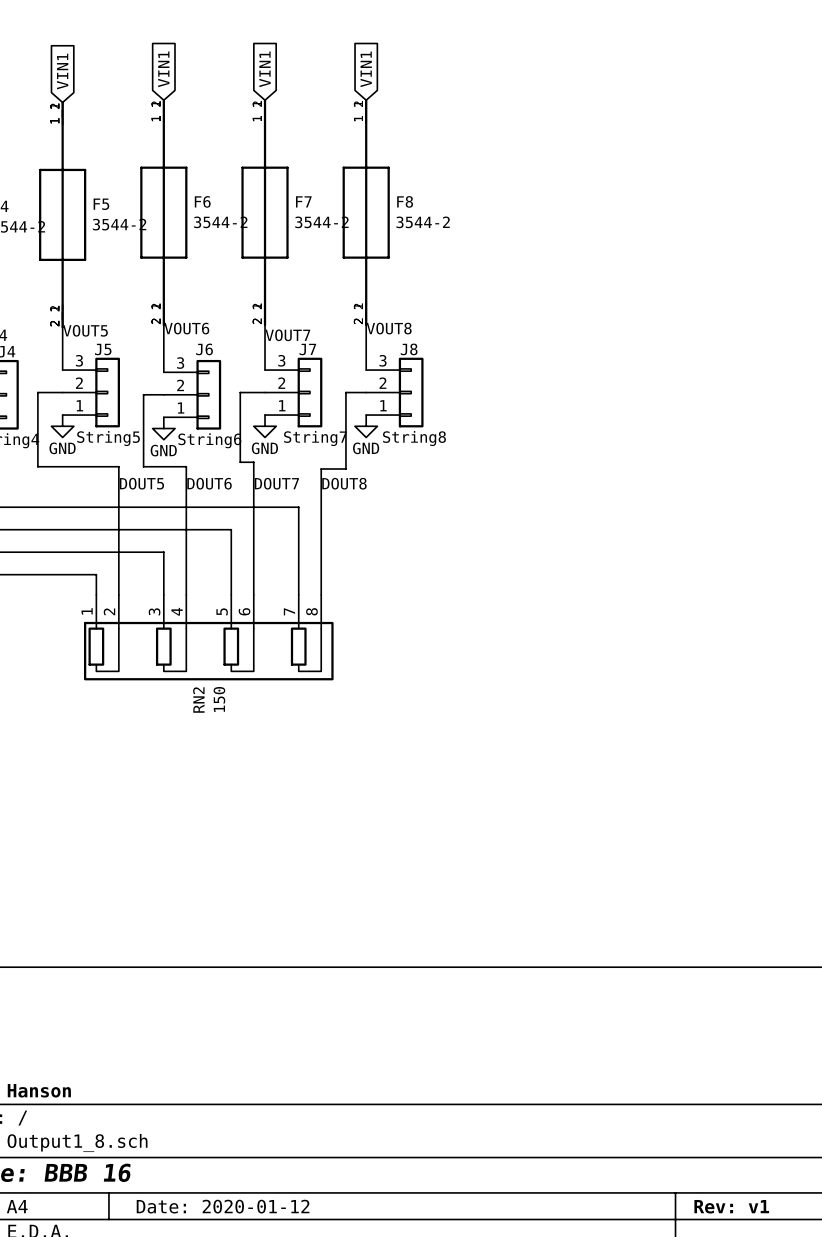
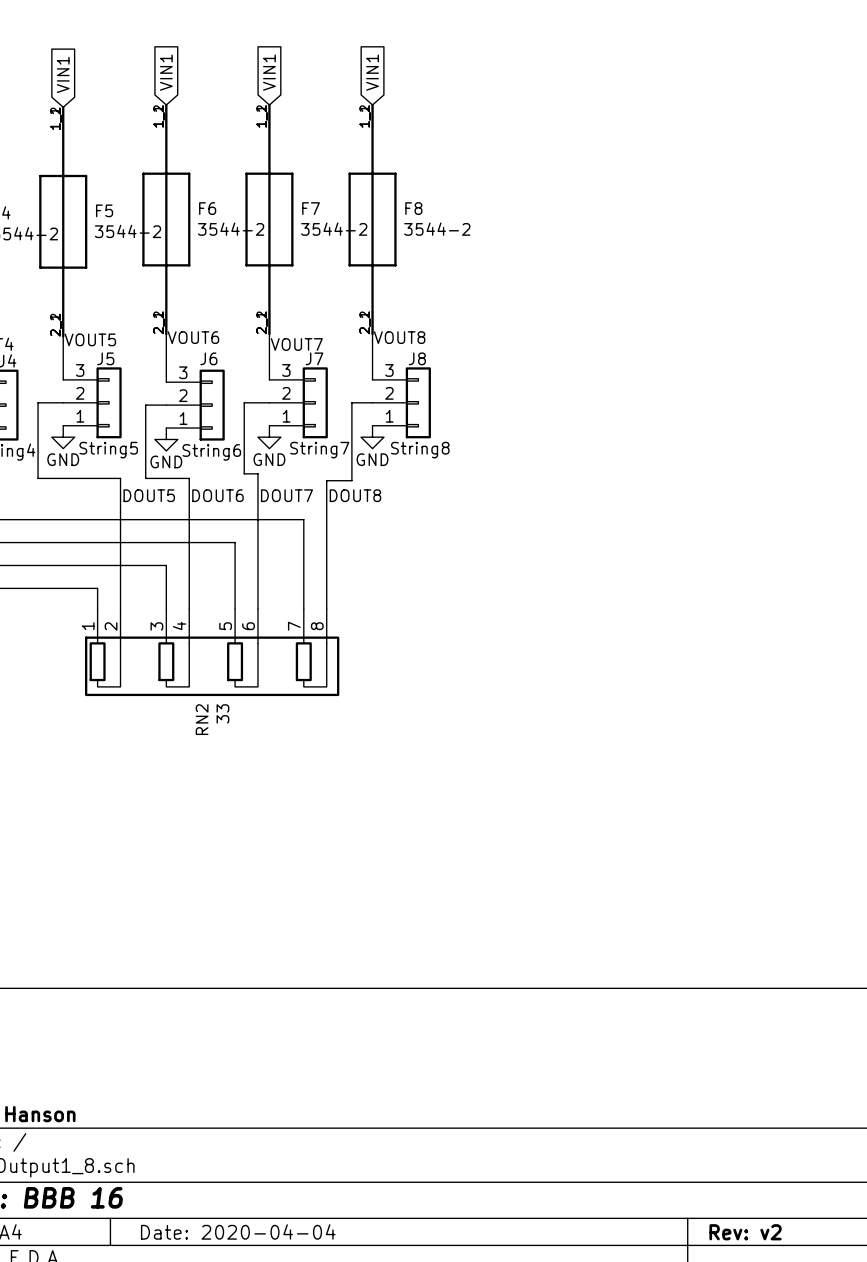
RN2 value: 150 (219, 699) -> 33 (222, 713)
title block: Date: 2020-01-12 (223, 1206) -> Date: 2020-04-04 (238, 1231)
title block: Rev: v1 (731, 1206) -> Rev: v2 (745, 1232)

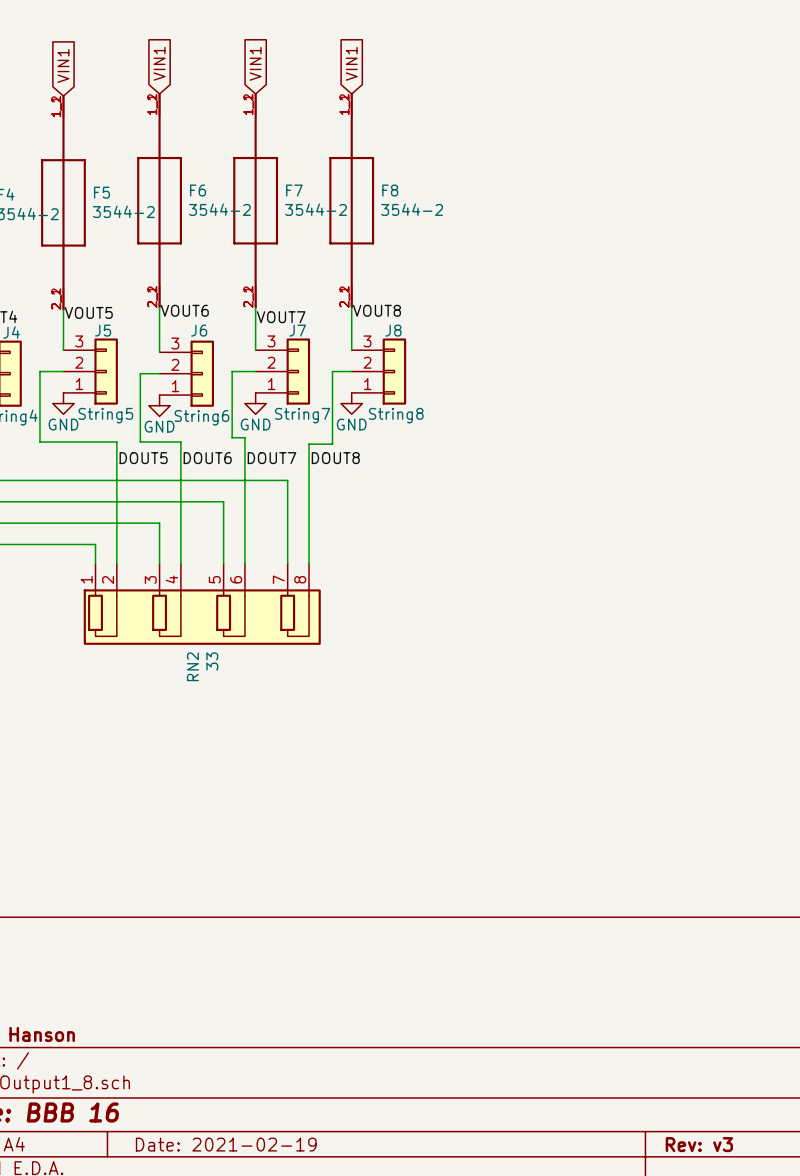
title block: Date: 2020-04-04 (238, 1231) -> Date: 2021-02-19 (226, 1144)
title block: Rev: v2 (745, 1232) -> Rev: v3 (699, 1144)

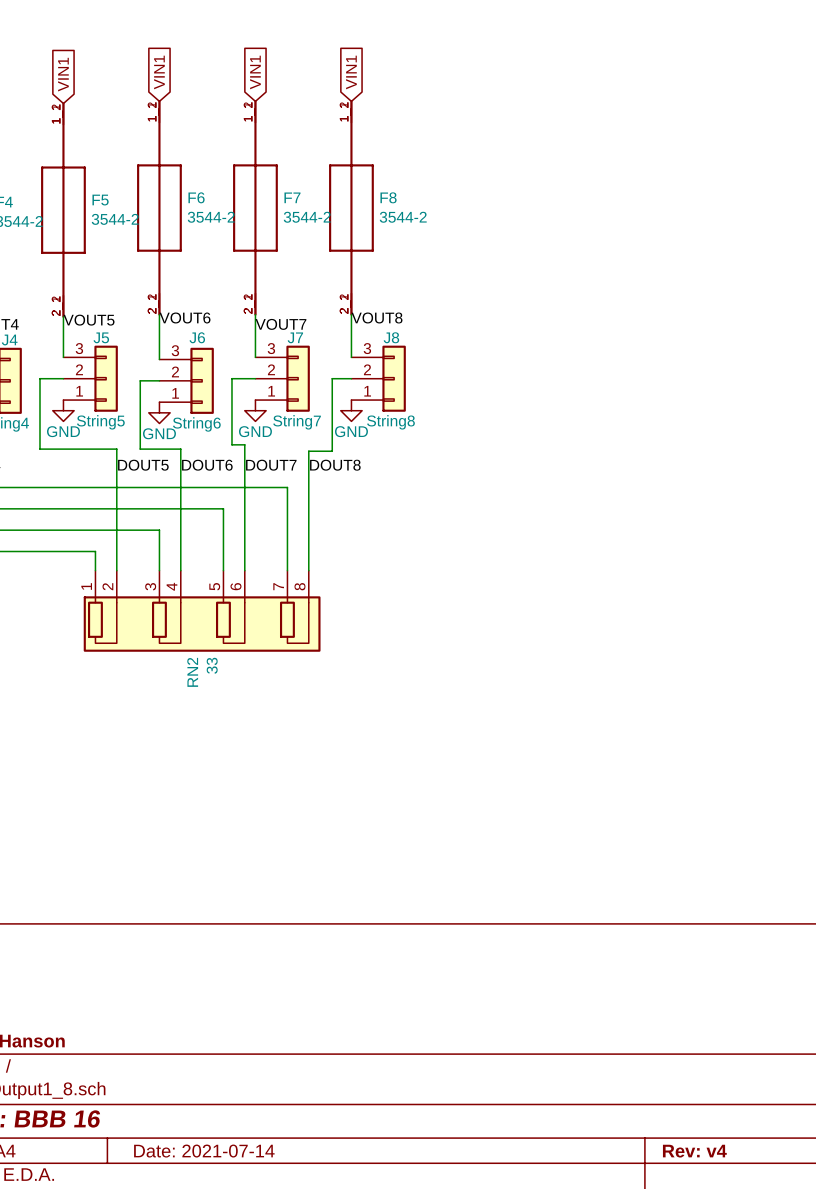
title block: Date: 2021-02-19 (226, 1144) -> Date: 2021-07-14 (204, 1151)
title block: Rev: v3 (699, 1144) -> Rev: v4 (694, 1151)

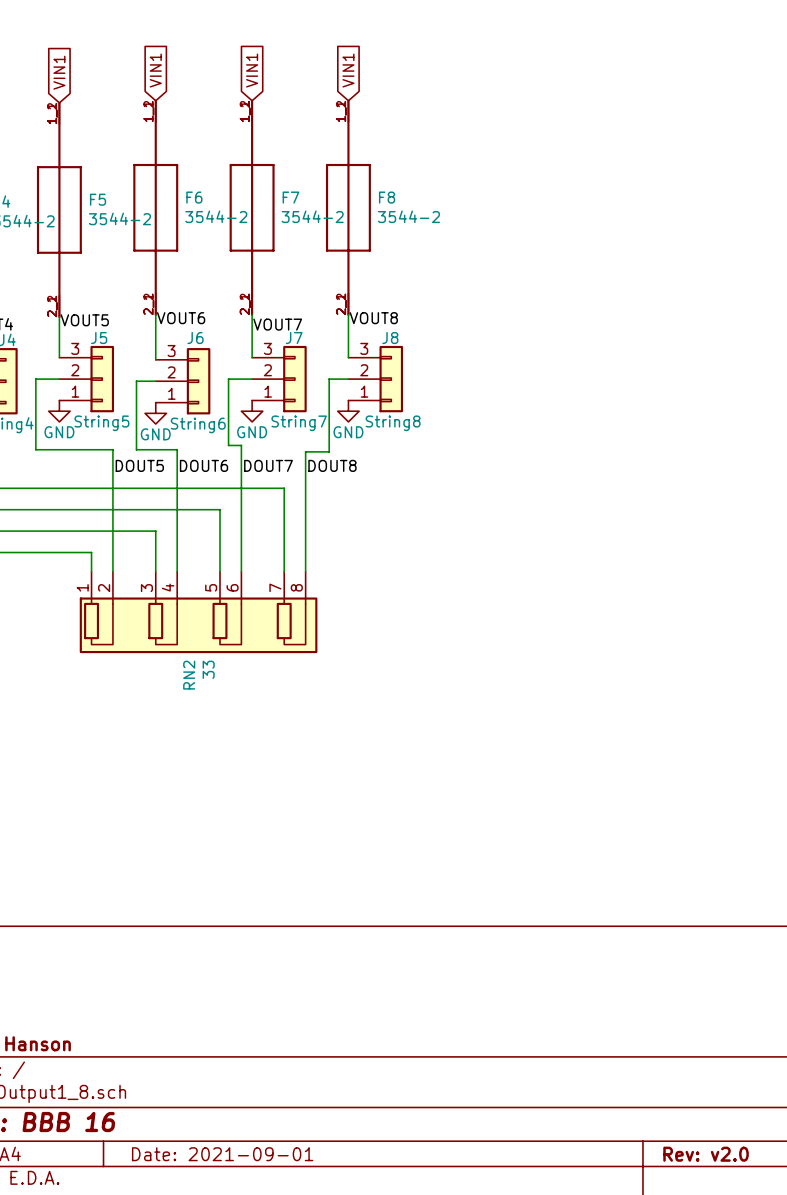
title block: Date: 2021-07-14 (204, 1151) -> Date: 2021-09-01 (222, 1154)
title block: Rev: v4 (694, 1151) -> Rev: v2.0 (706, 1154)

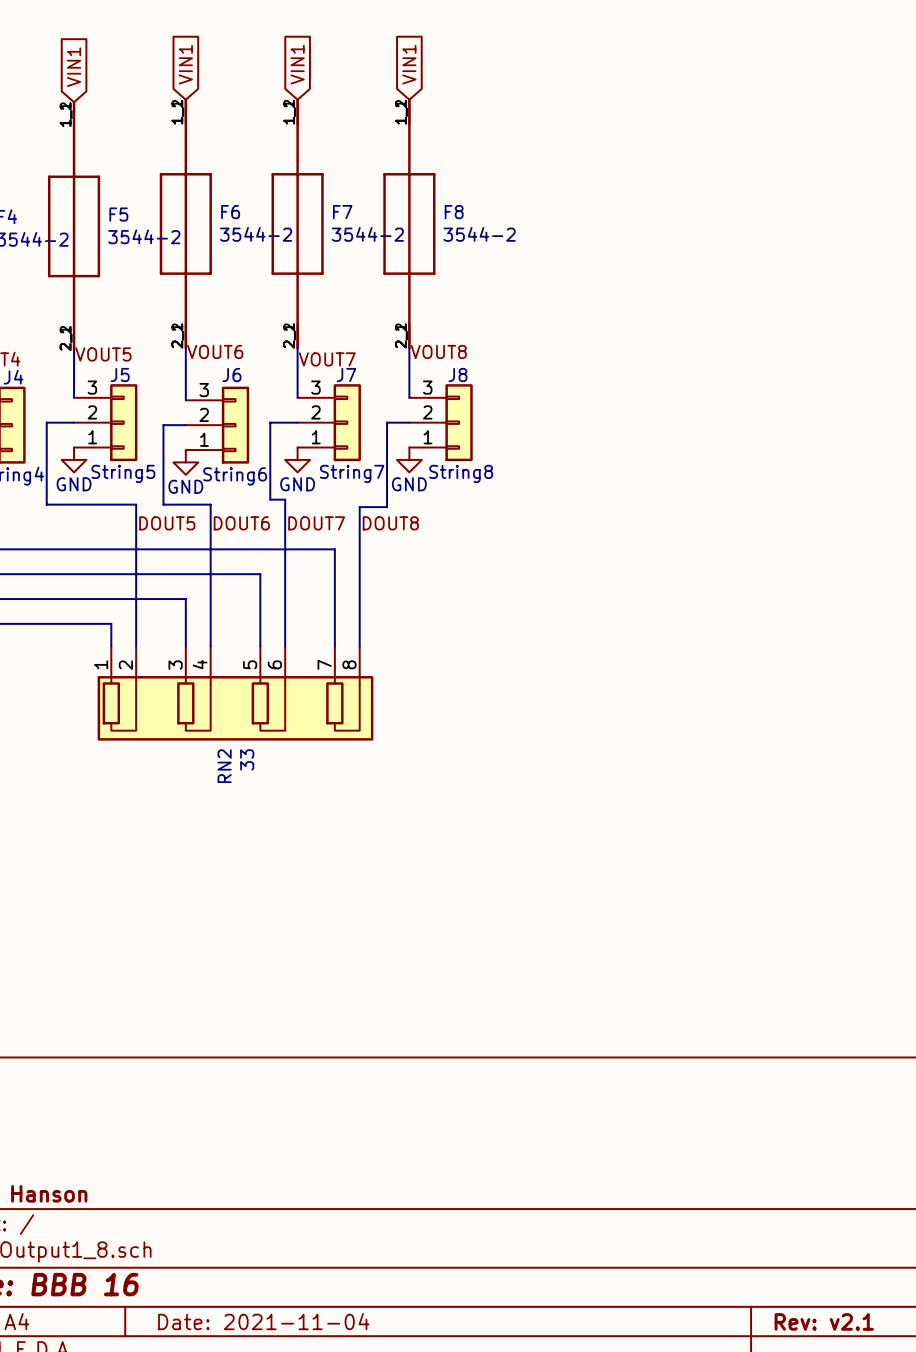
title block: Date: 2021-09-01 (222, 1154) -> Date: 2021-11-04 (263, 1321)
title block: Rev: v2.0 (706, 1154) -> Rev: v2.1 (824, 1321)

